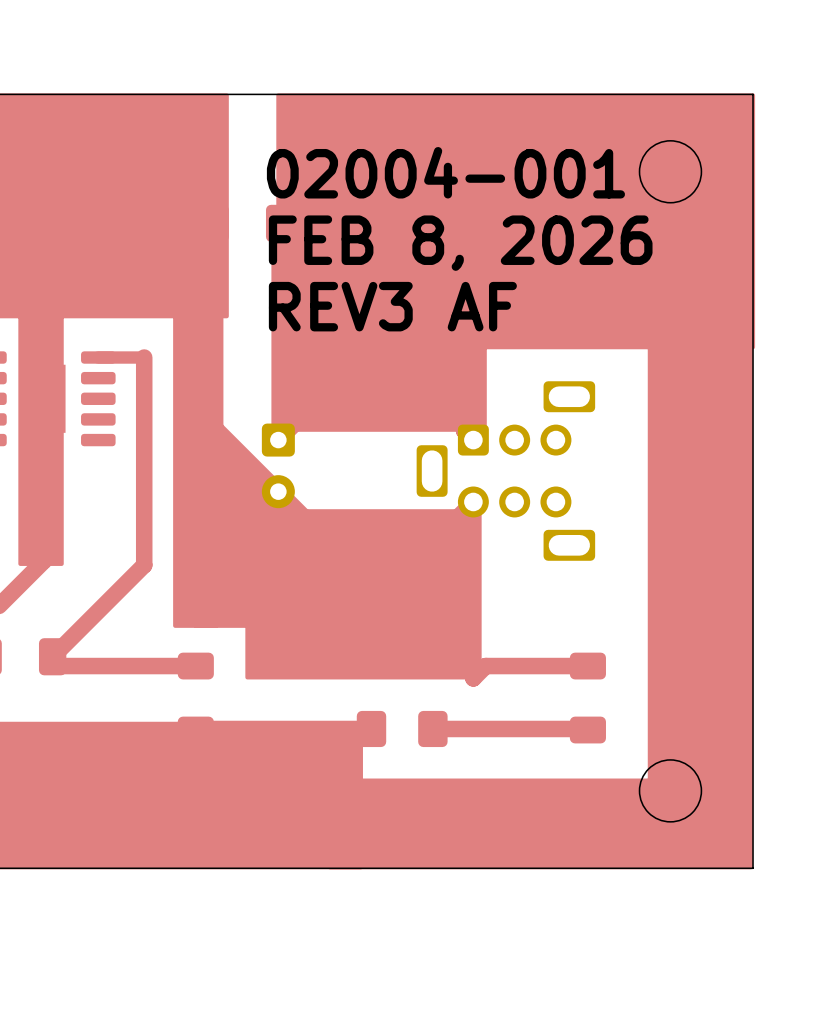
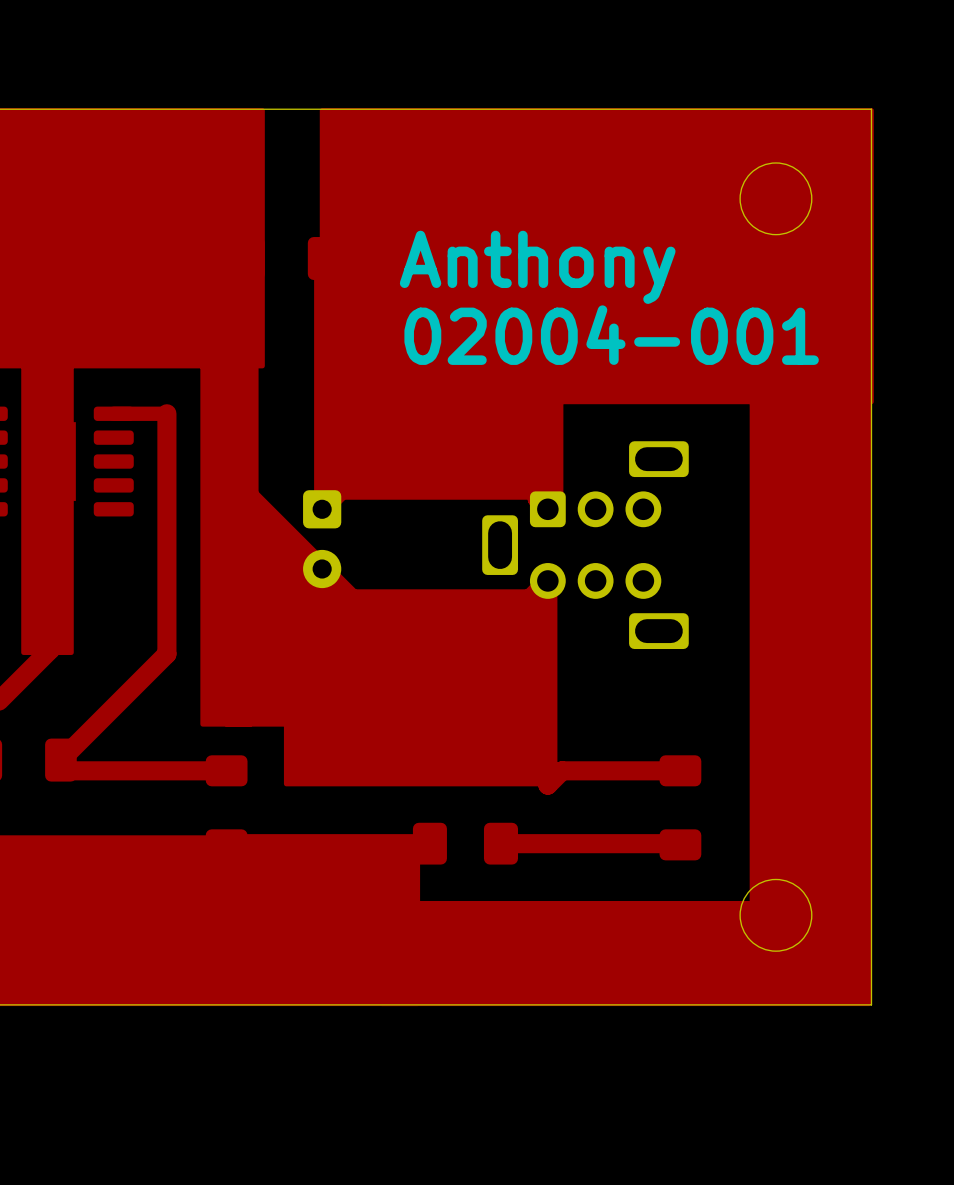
text position: 02004-001 (445, 172) -> 02004-001 (611, 335)
text: none -> Anthony (537, 267)
text: FEB 8, 2026 (460, 243) -> none
text: REV3 AF (392, 306) -> none

